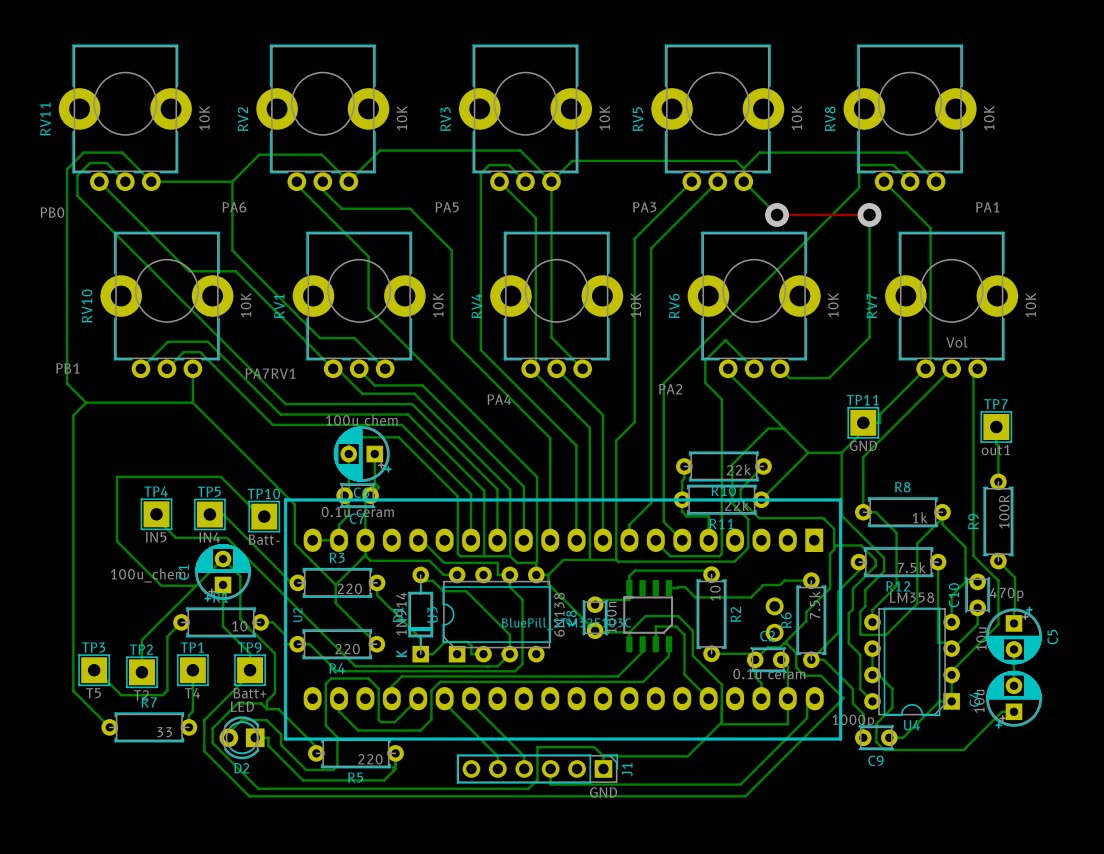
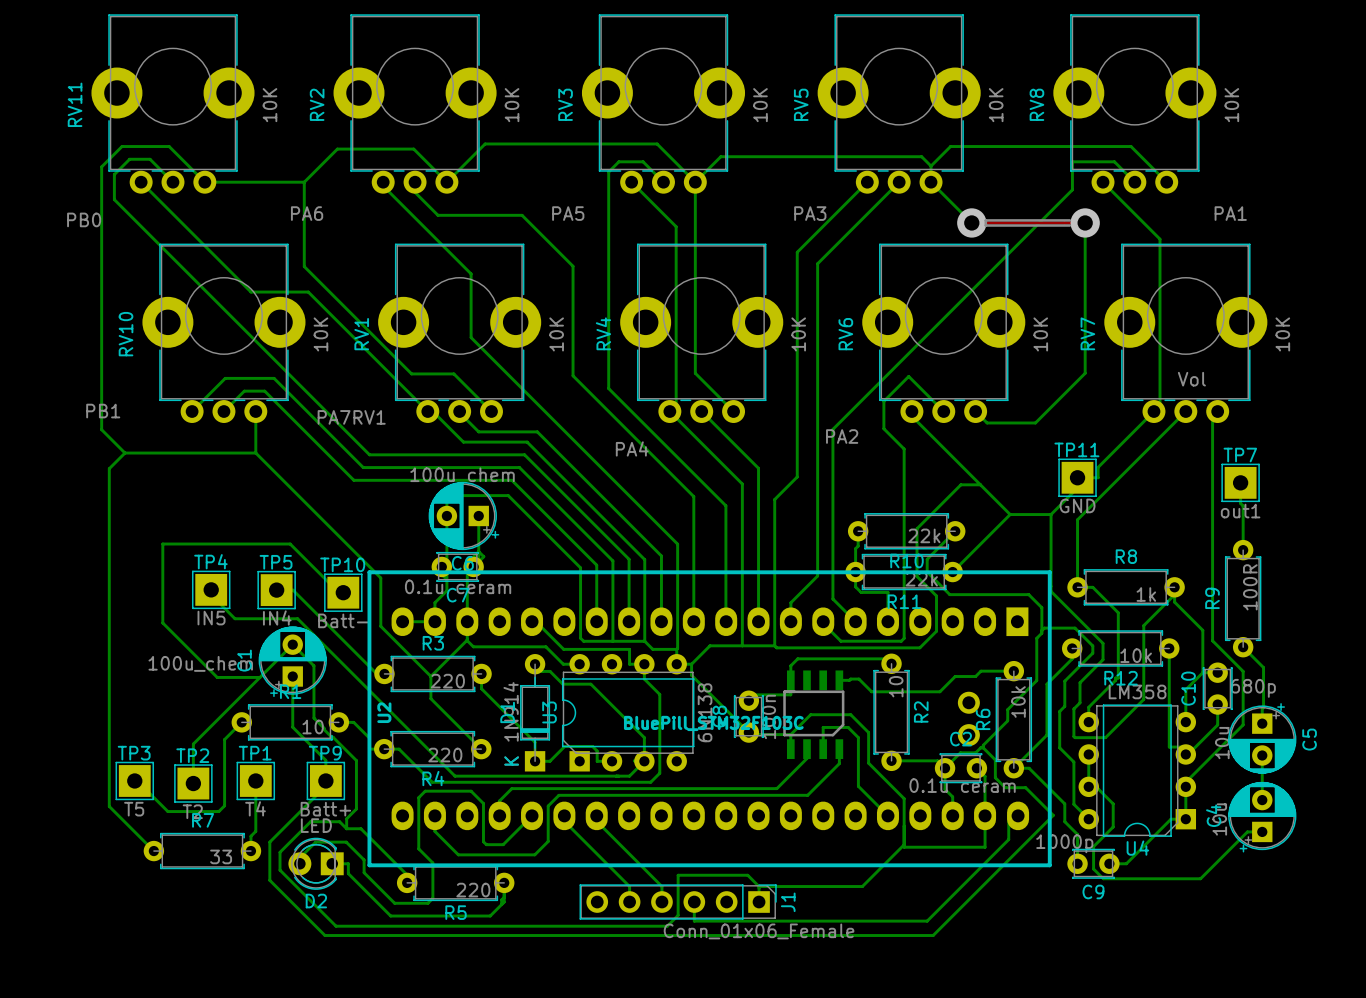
line: none -> (1069, 220) (985, 220) (985, 225) (1069, 225)
R12 value: 7.5k (911, 567) -> 10k (1136, 655)
C10 value: 470p (1006, 594) -> 680p (1253, 688)
R6 value: 7.5k (814, 605) -> 10k (1018, 701)
J1 value: GND (603, 792) -> Conn_01x06_Female (759, 931)

